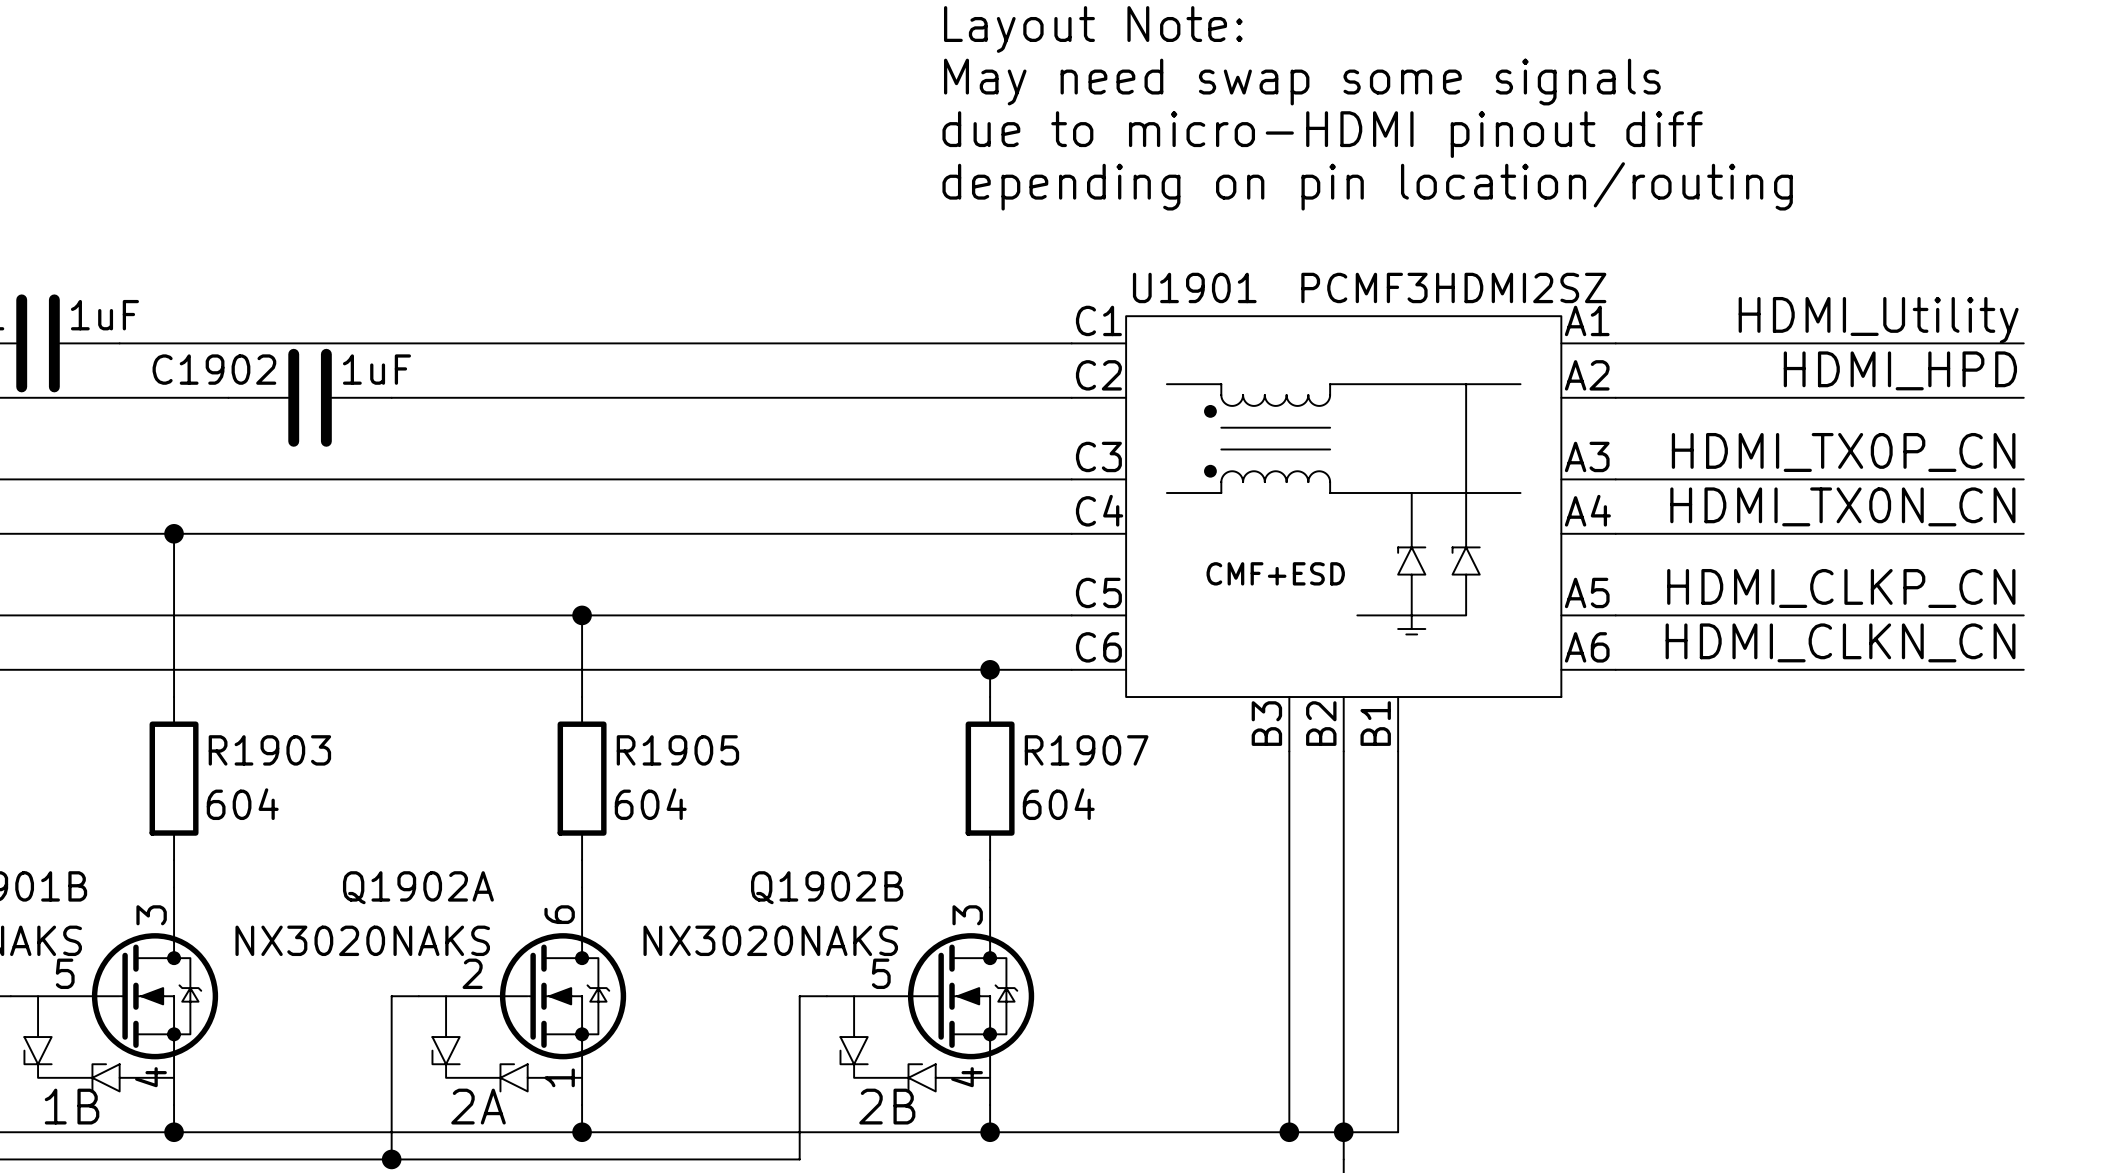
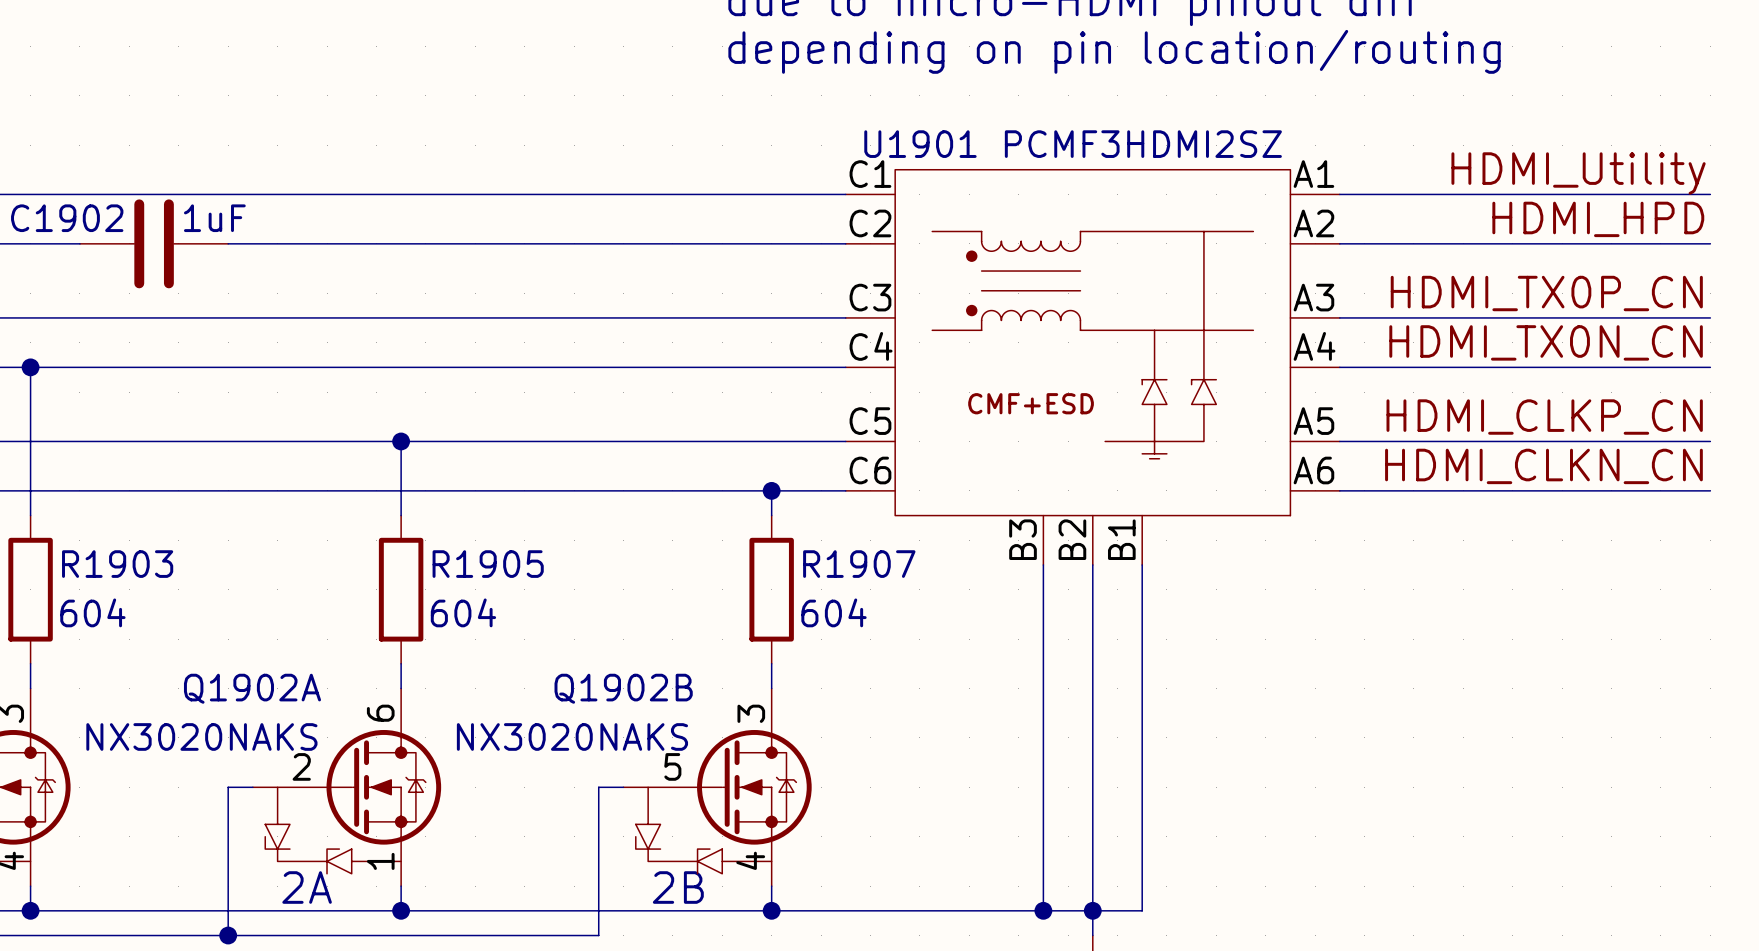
U1901 name position: U1901 (1194, 287) -> U1901 (920, 144)
U1901 value position: PCMF3HDMI2SZ (1453, 287) -> PCMF3HDMI2SZ (1143, 144)

